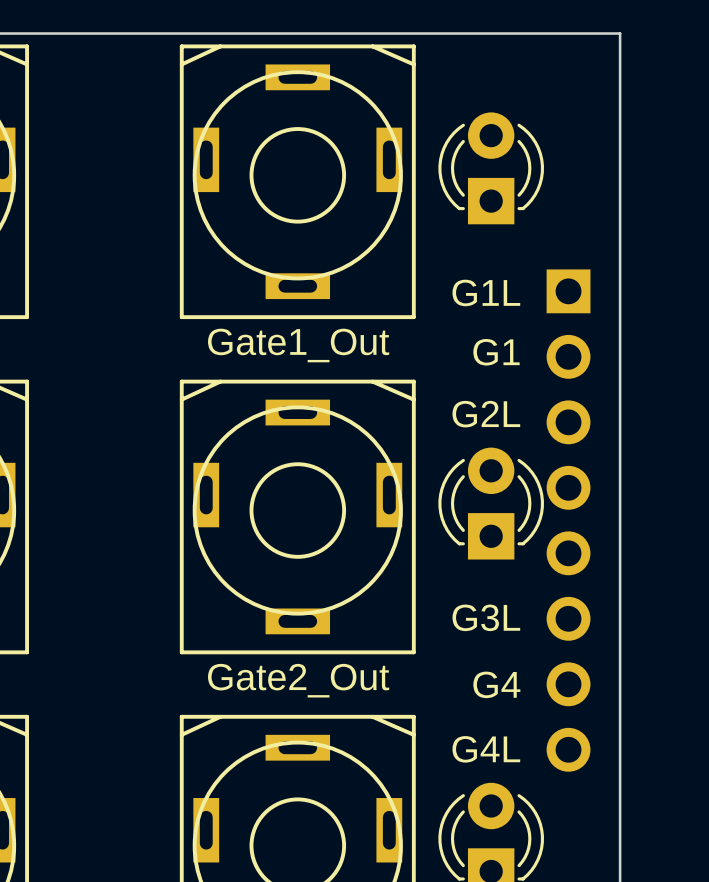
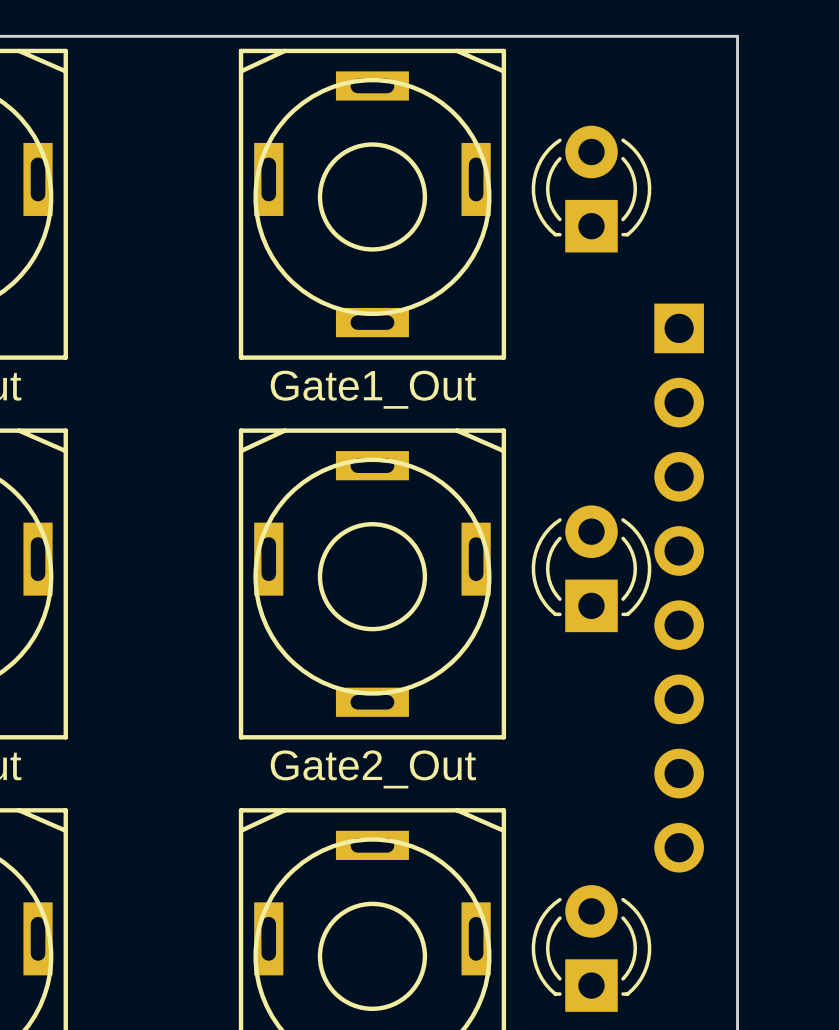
text: G1L (486, 292) -> none
text: G1 (496, 352) -> none
text: G2L (486, 414) -> none
text: G3L (486, 617) -> none
text: G4 (496, 684) -> none
text: G4L (486, 749) -> none

